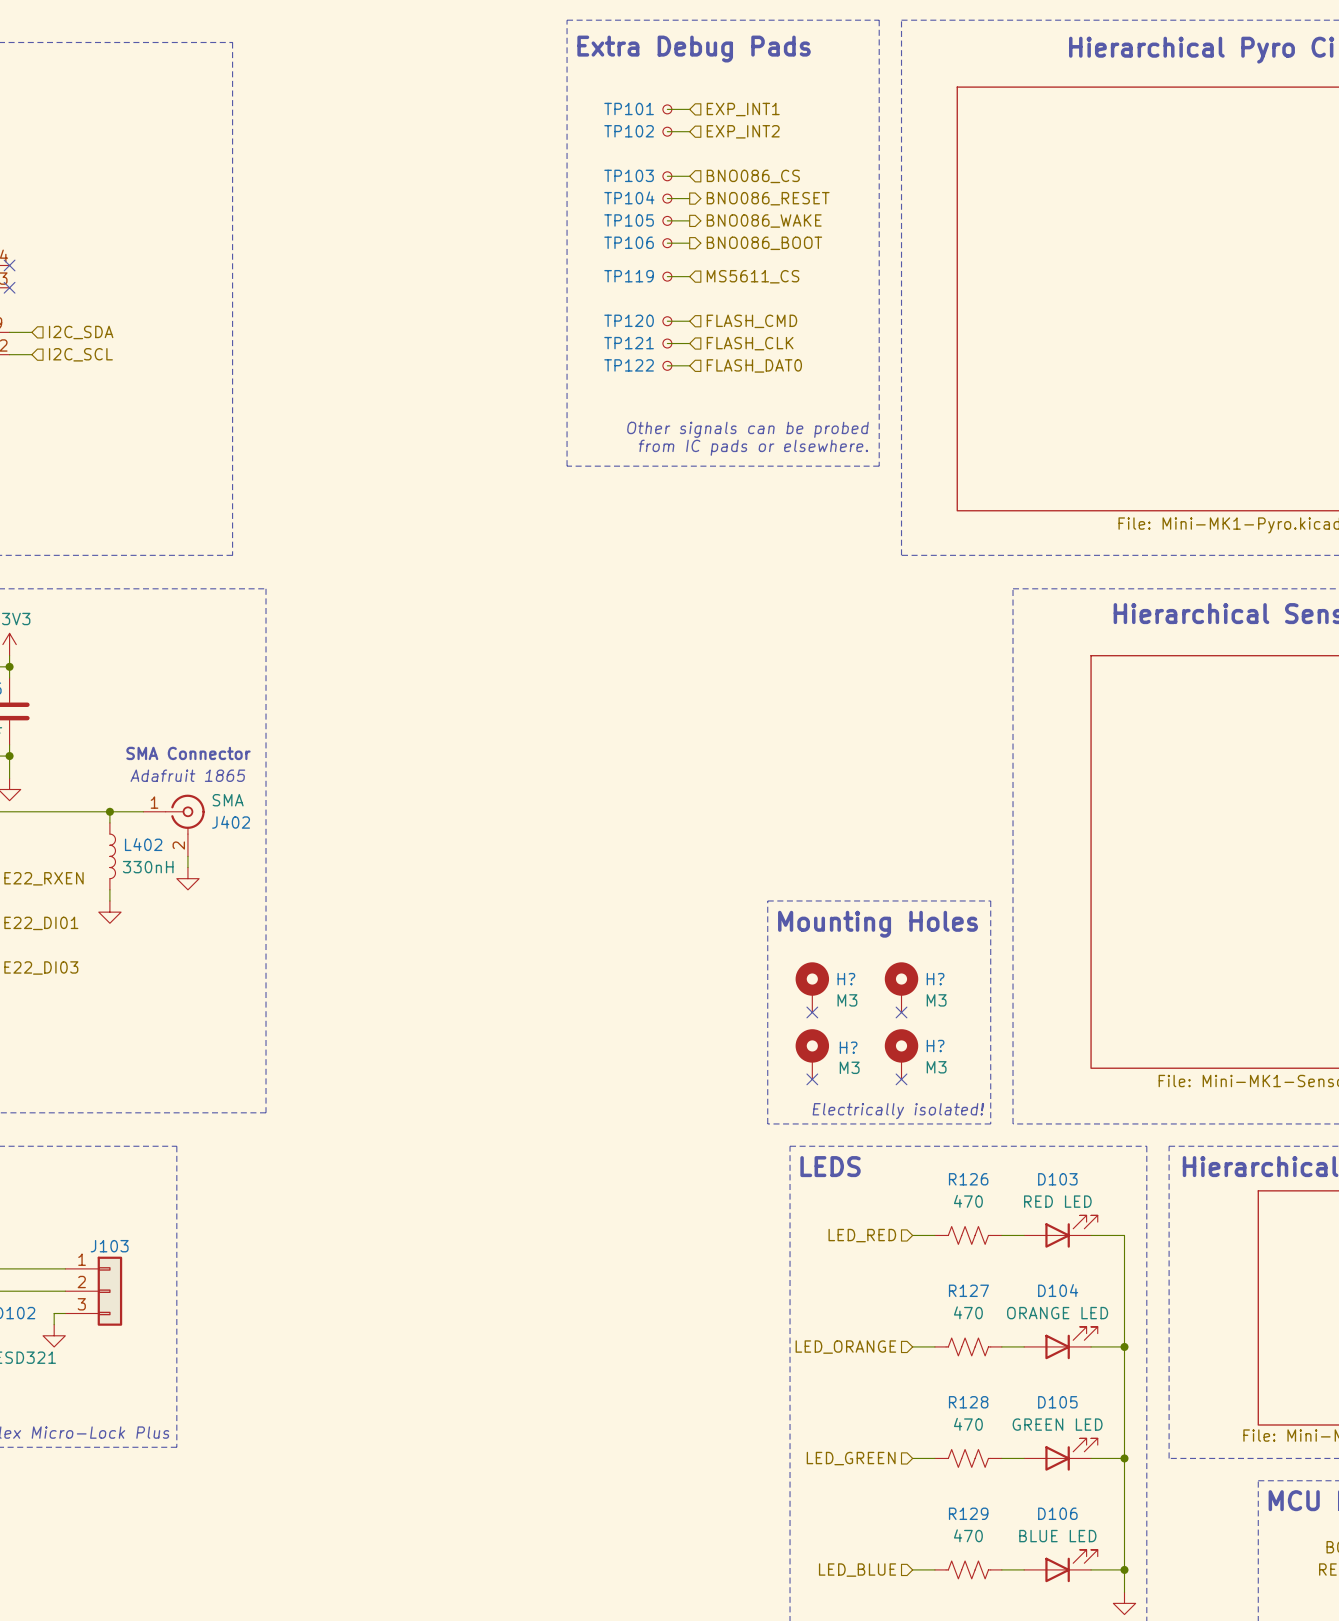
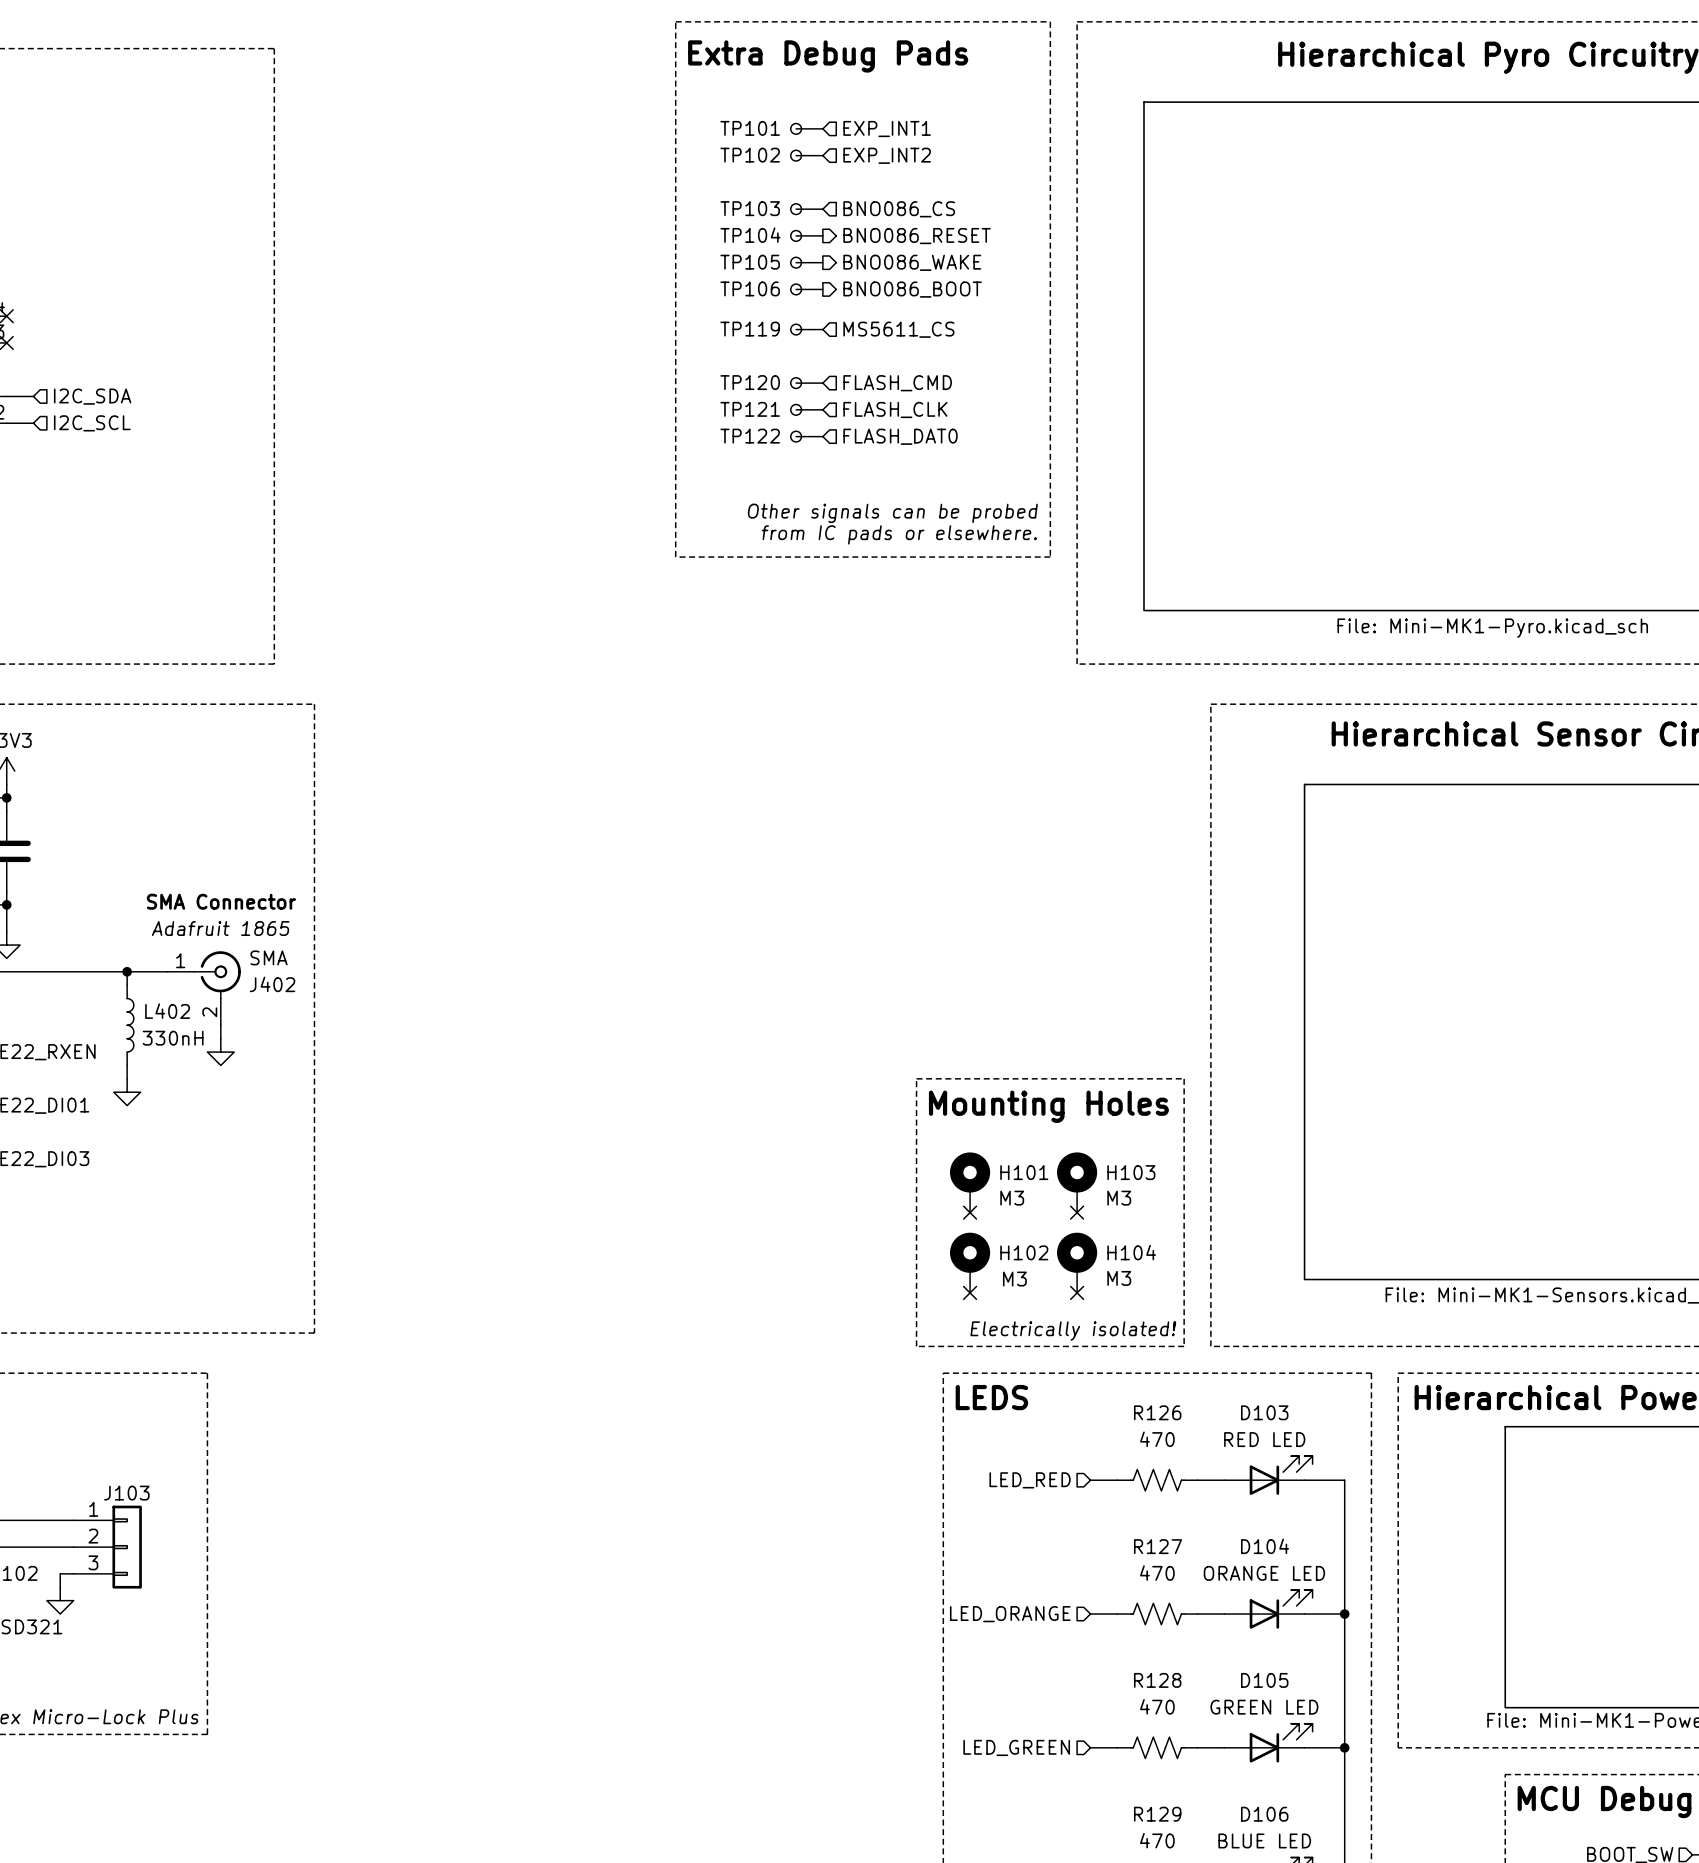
H? name: H? (846, 979) -> H101 (1024, 1172)
H? name: H? (935, 979) -> H103 (1131, 1172)
H? name: H? (935, 1046) -> H104 (1131, 1252)
H? name: H? (848, 1047) -> H102 (1024, 1252)

